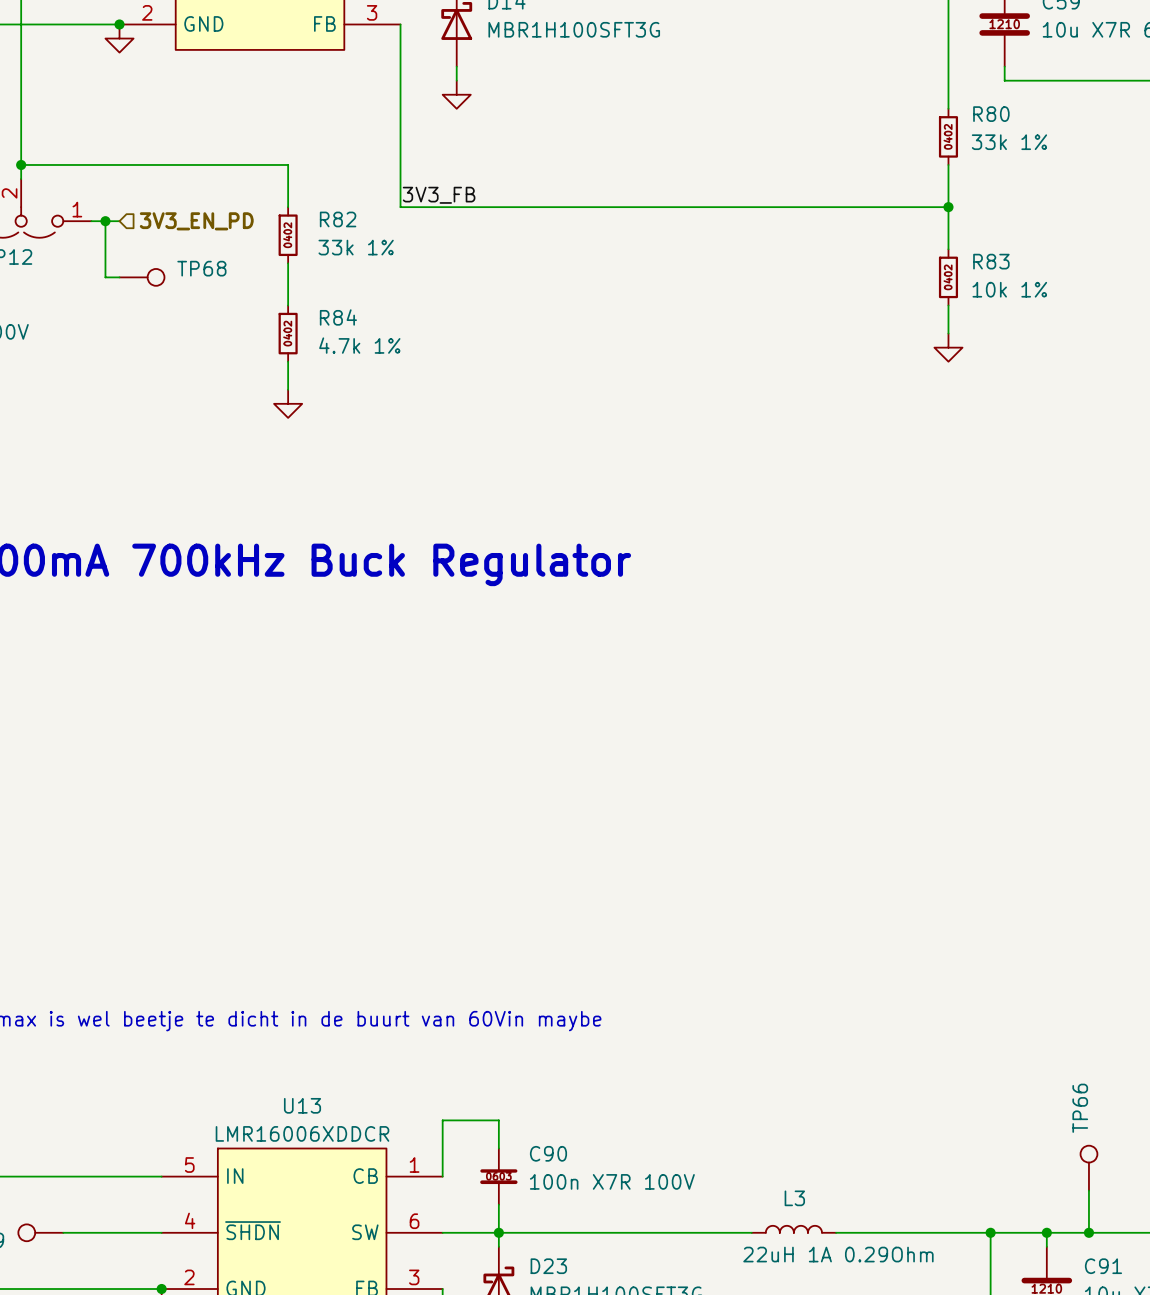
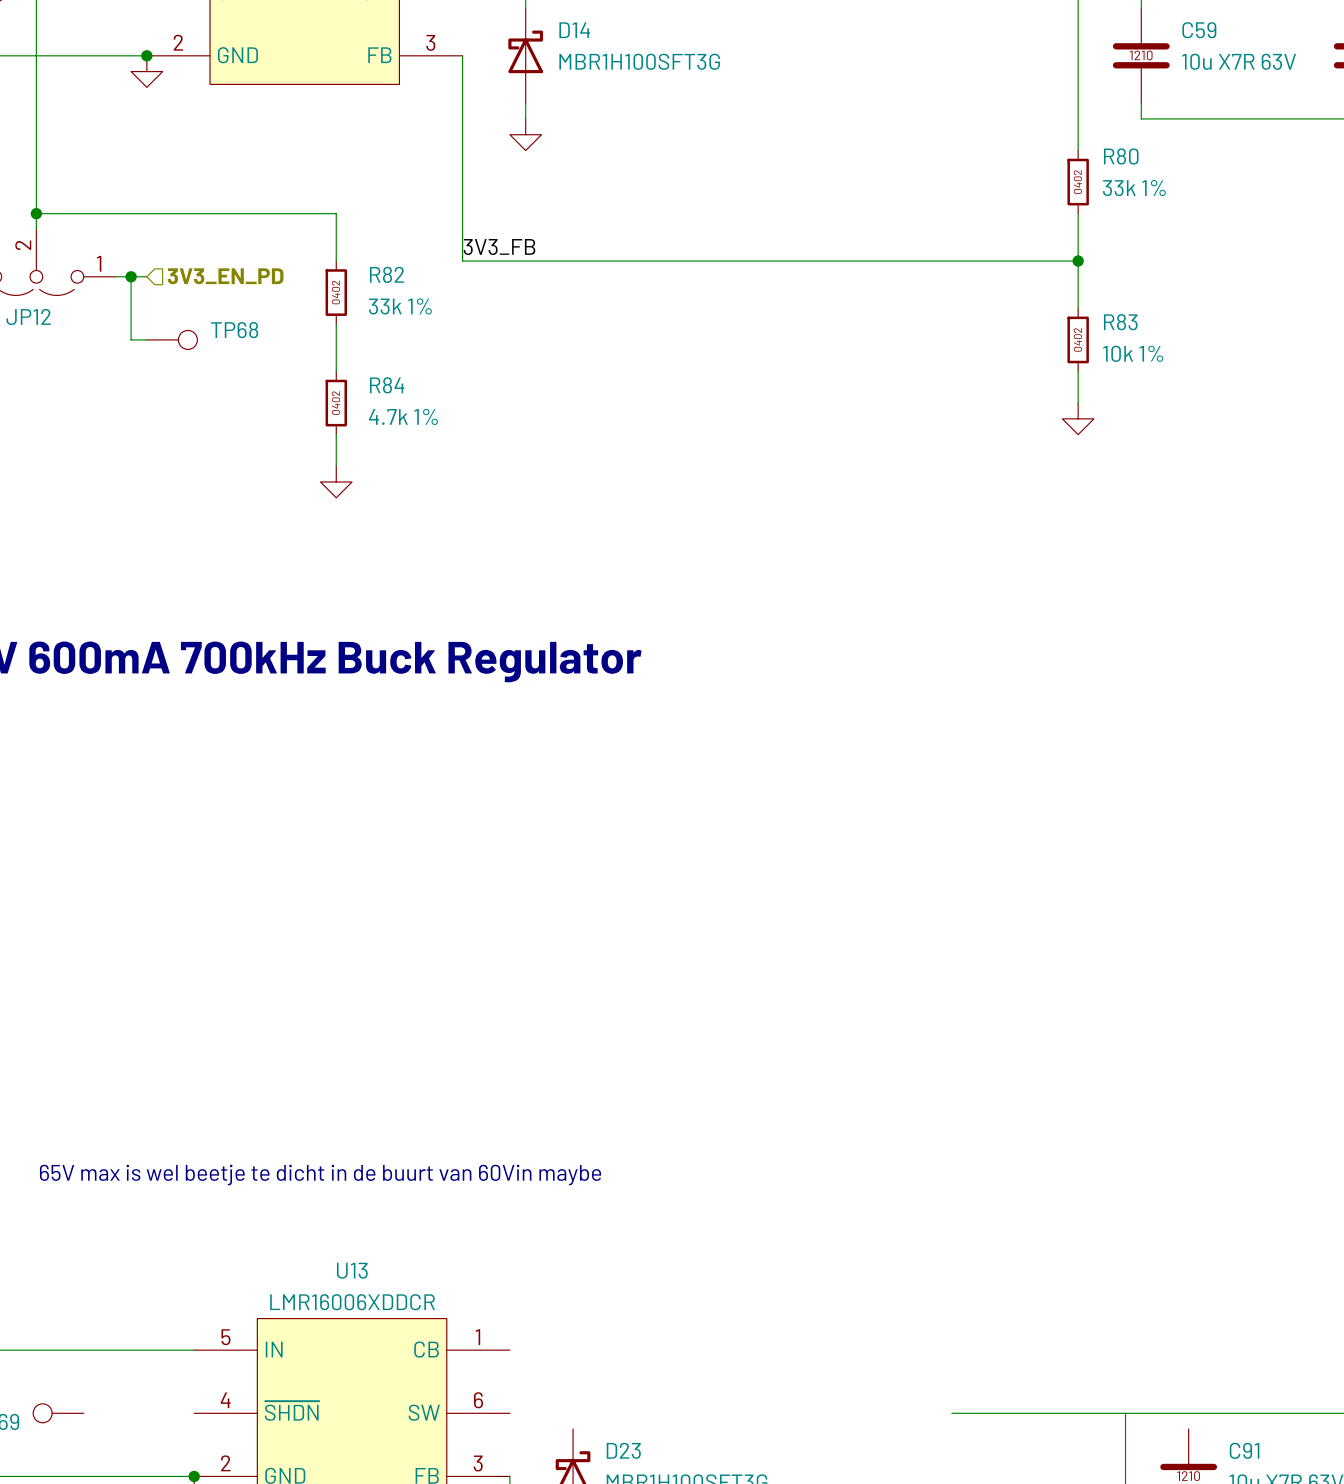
wire: (498, 1148) (498, 1120) (442, 1120) (442, 1176) -> none
TP66: (1088, 1168) -> none
C90: 100n X7R 100V (498, 1176) -> none
wire: (1088, 1190) (1088, 1232) -> none
wire: (498, 1204) (498, 1246) -> none
L3: 22uH 1A 0.29Ohm (793, 1229) -> none
wire: (63, 1232) (161, 1232) -> none
wire: (442, 1232) (751, 1232) -> none
junction: (498, 1232) -> none
junction: (990, 1232) -> none
wire: (1046, 1232) (1046, 1246) -> none
junction: (1046, 1232) -> none
junction: (1088, 1232) -> none

